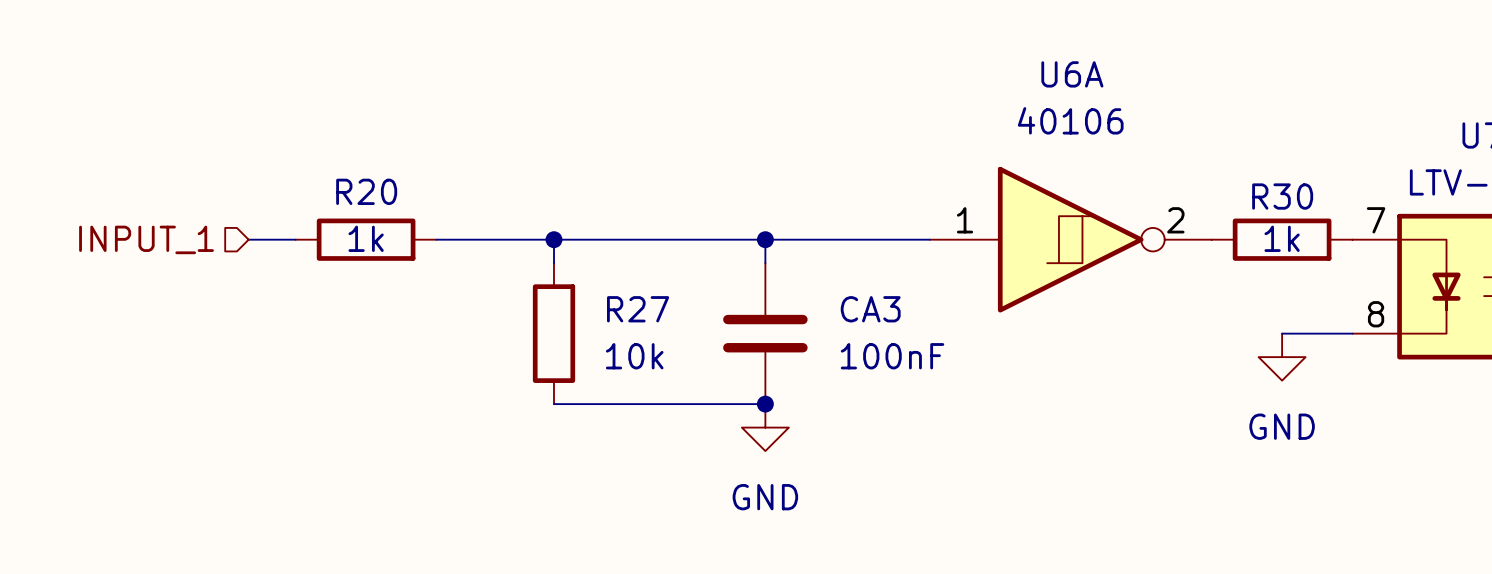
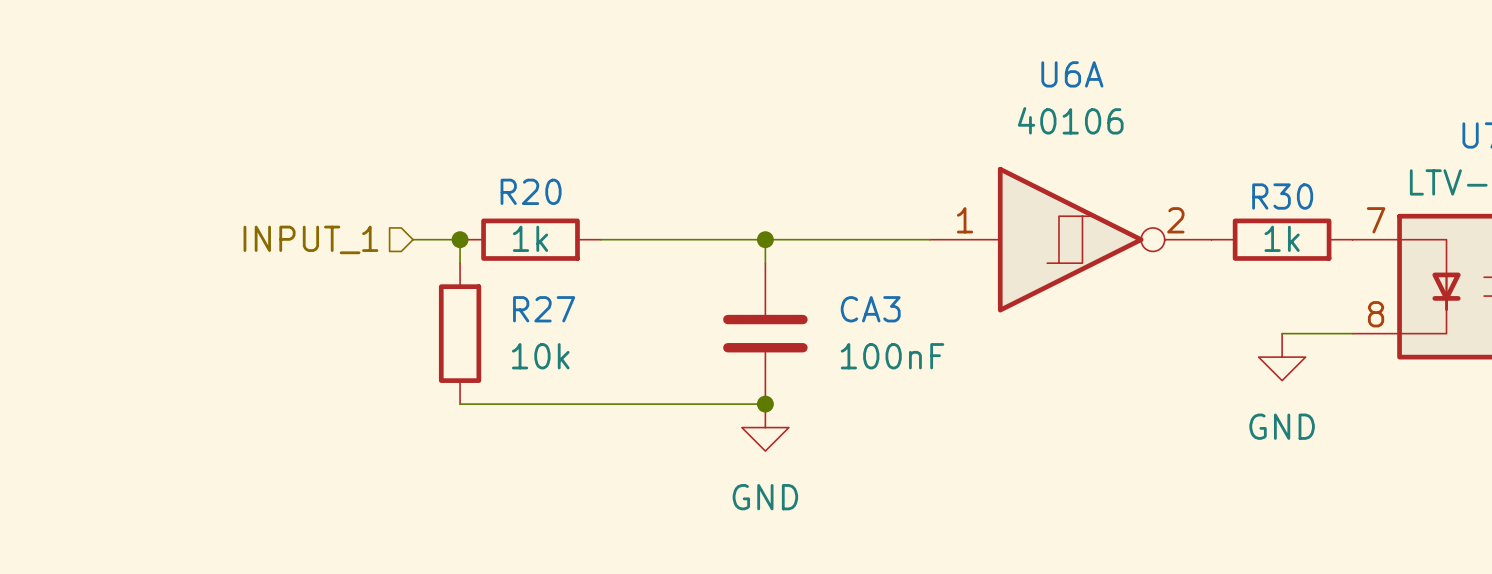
hierarchical label position: INPUT_1 (146, 239) -> INPUT_1 (310, 239)
wire: (248, 239) (295, 239) -> none
R20 position: (366, 239) -> (530, 239)
wire: (460, 239) (600, 239) -> (460, 239) (460, 263)
wire: (554, 239) (554, 263) -> none
junction position: (554, 239) -> (460, 239)
R27 position: (554, 333) -> (460, 333)
wire: none -> (460, 404) (554, 404)

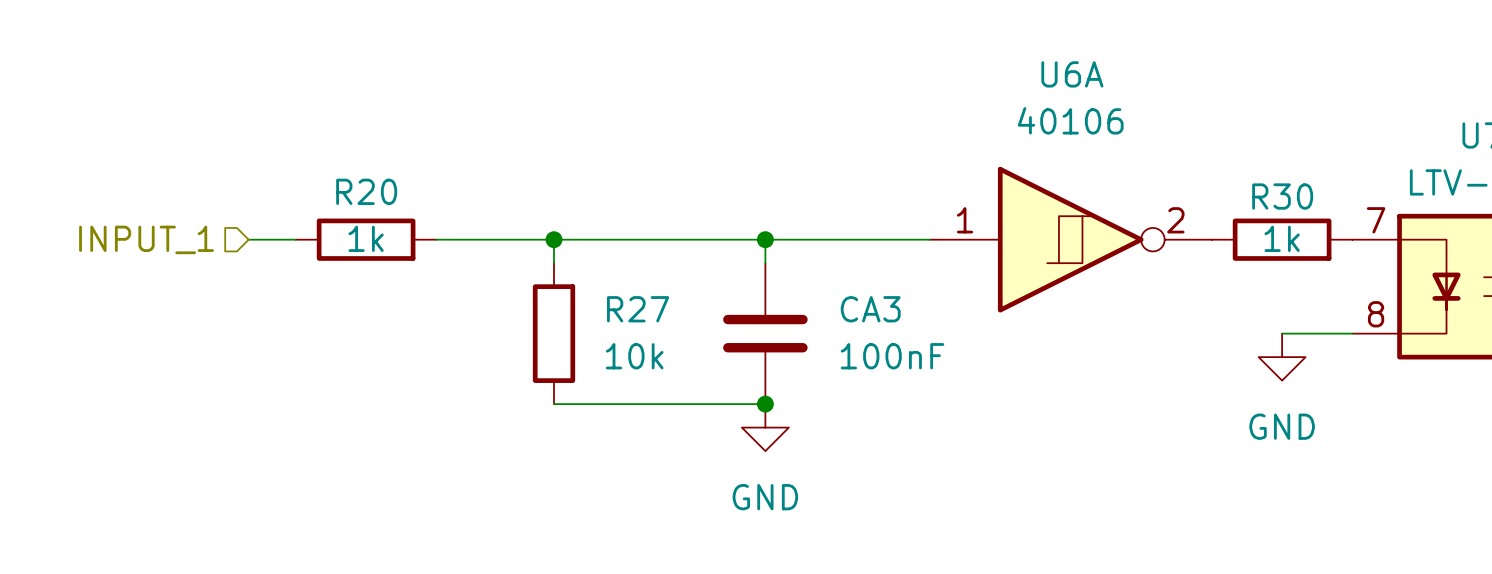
wire: none -> (248, 239) (295, 239)
hierarchical label position: INPUT_1 (310, 239) -> INPUT_1 (146, 239)
wire: (460, 239) (460, 263) -> (460, 239) (600, 239)
junction position: (460, 239) -> (554, 239)
R20 position: (530, 239) -> (366, 239)
wire: none -> (554, 239) (554, 263)
R27 position: (460, 333) -> (554, 333)
wire: (460, 404) (554, 404) -> none

